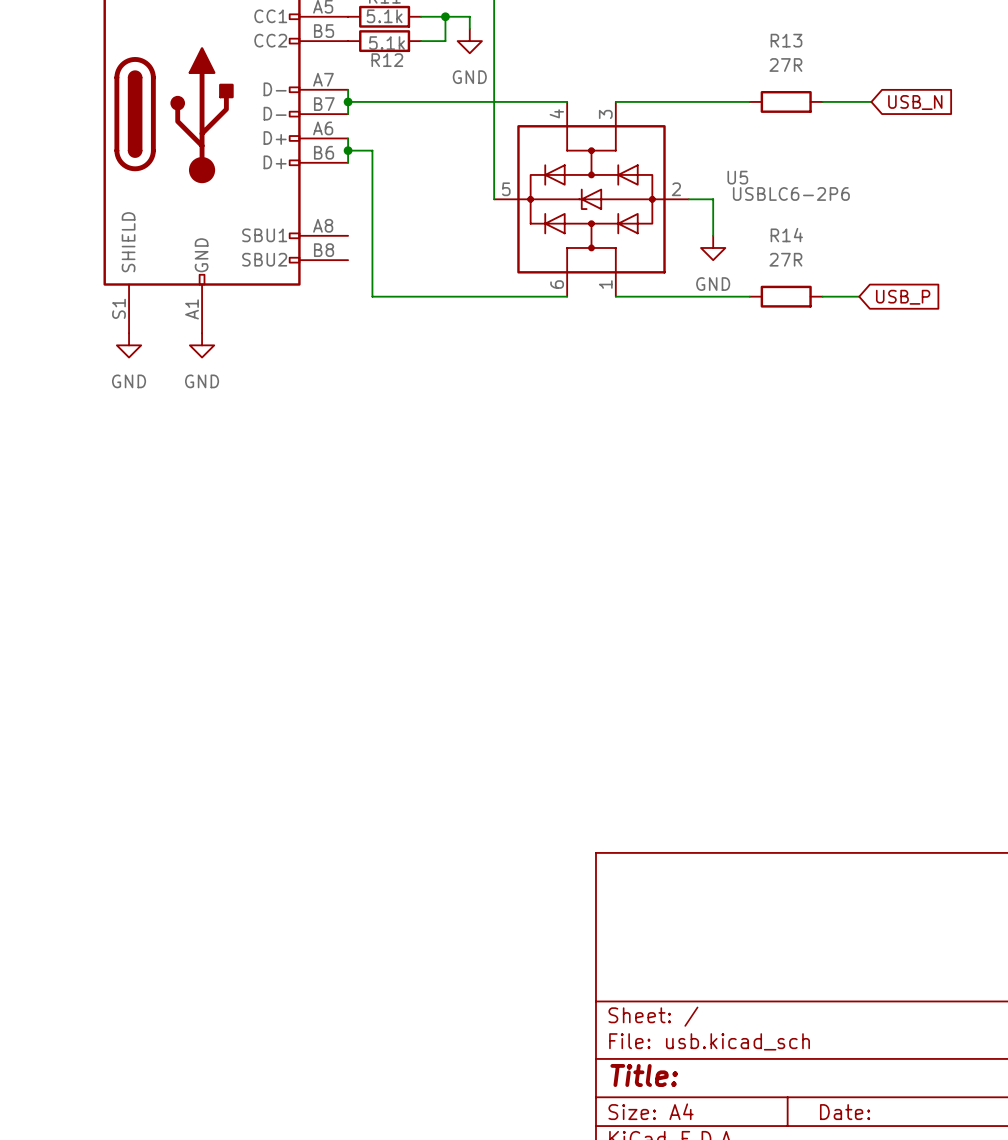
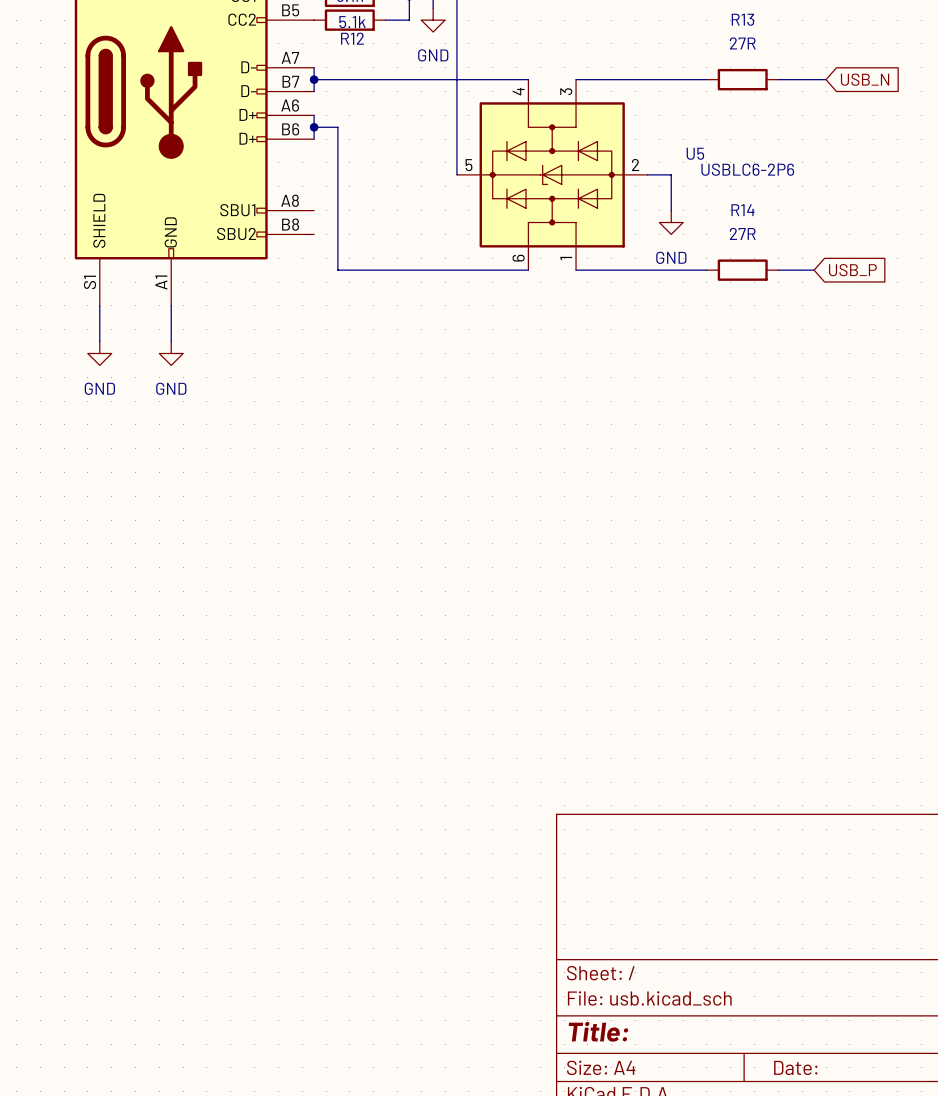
wire: none -> (99, 305) (99, 341)
wire: none -> (171, 305) (171, 341)
power symbol position: GND (129, 345) -> GND (99, 353)
power symbol position: GND (202, 345) -> GND (171, 353)

